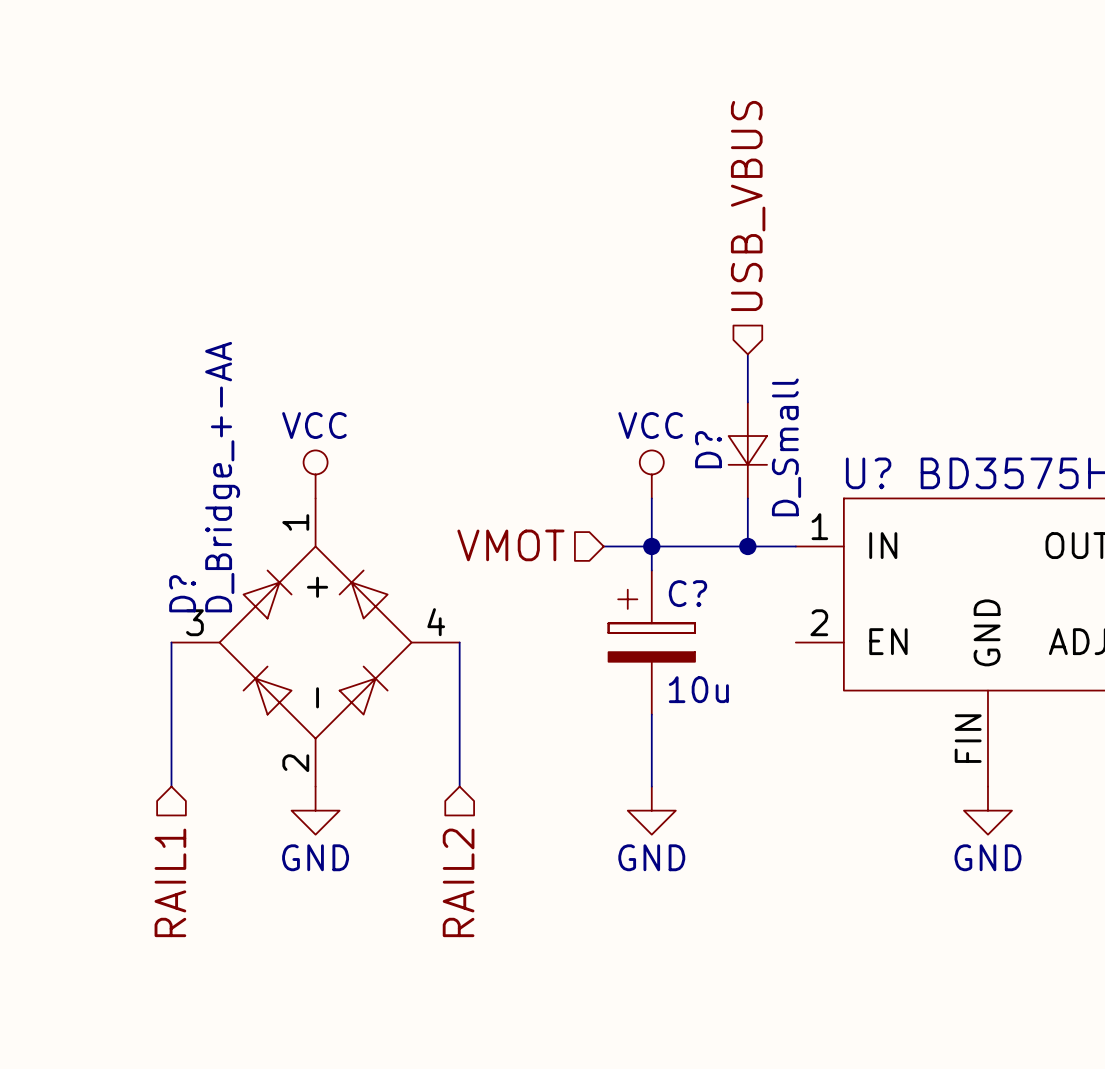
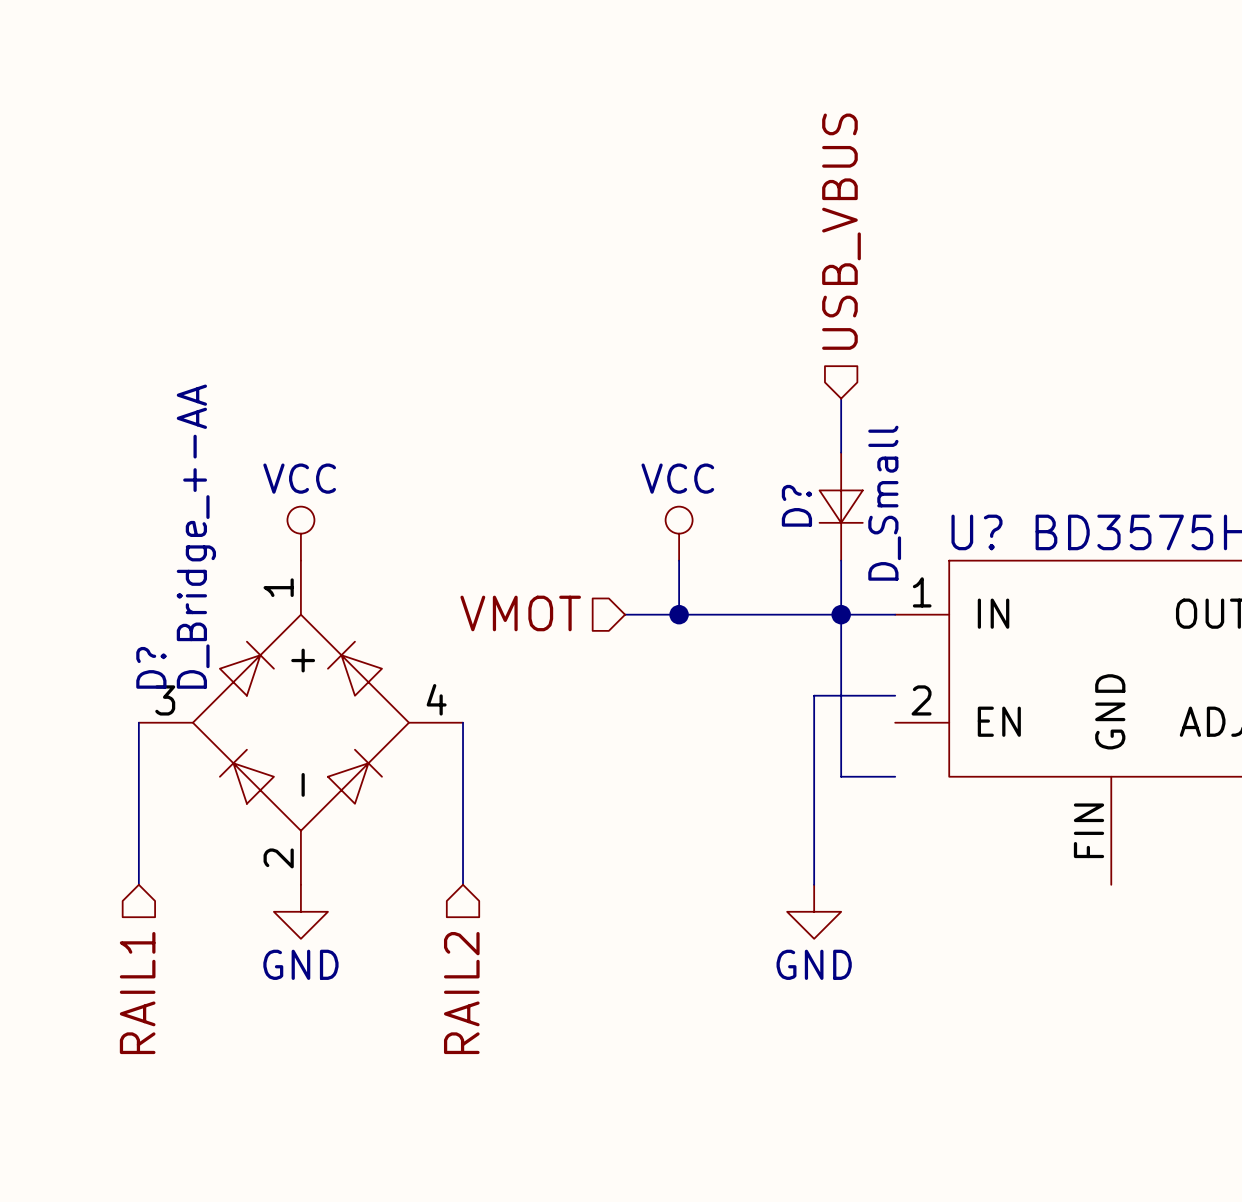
power symbol position: VCC (315, 474) -> VCC (300, 533)
power symbol position: VCC (651, 474) -> VCC (679, 533)
wire: none -> (679, 560) (679, 614) (625, 614)
wire: (651, 498) (651, 570) -> none
hierarchical label position: VMOT (510, 545) -> VMOT (520, 613)
junction position: (651, 546) -> (679, 614)
wire: none -> (841, 614) (841, 776) (895, 776)
wire: none -> (895, 695) (814, 695) (814, 884)
wire: (171, 642) (171, 786) -> (138, 722) (138, 884)
D? position: (315, 642) -> (300, 722)
wire: (459, 642) (459, 786) -> (463, 722) (463, 884)
C?: 10u (651, 642) -> none
wire: (651, 714) (651, 786) -> none
power symbol position: GND (315, 810) -> GND (300, 911)
power symbol position: GND (651, 810) -> GND (814, 911)
power symbol: GND (987, 810) -> none
hierarchical label position: RAIL1 (170, 882) -> RAIL1 (137, 993)
hierarchical label position: RAIL2 (458, 882) -> RAIL2 (461, 993)

